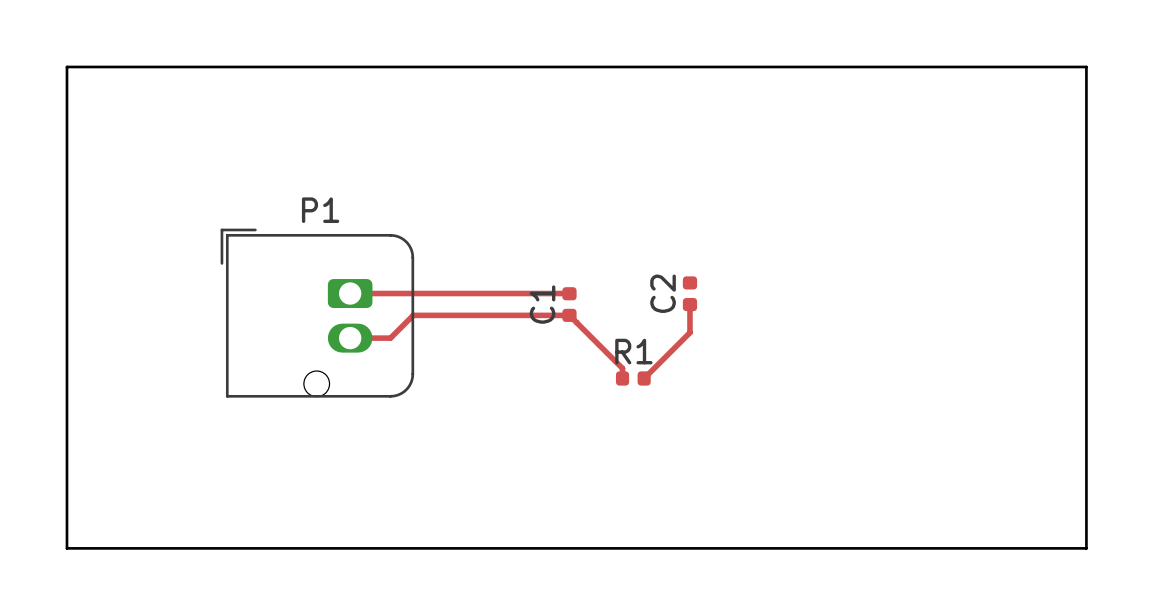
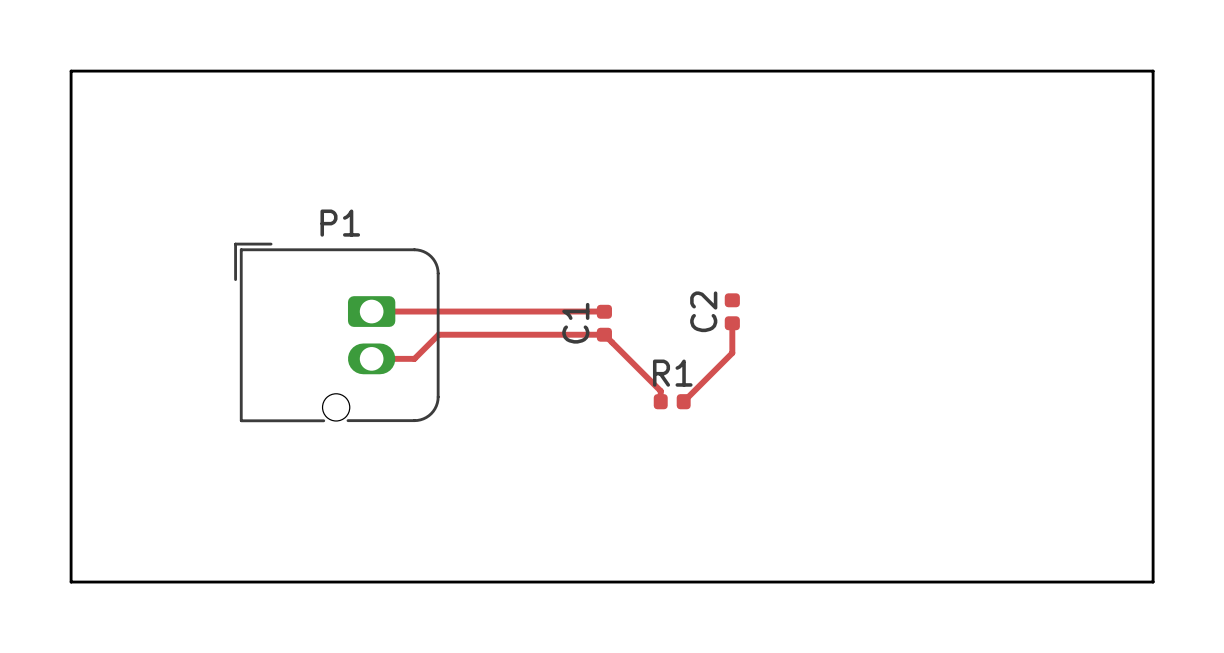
P1 footprint: [220, 228, 415, 398] -> [234, 242, 440, 423]

